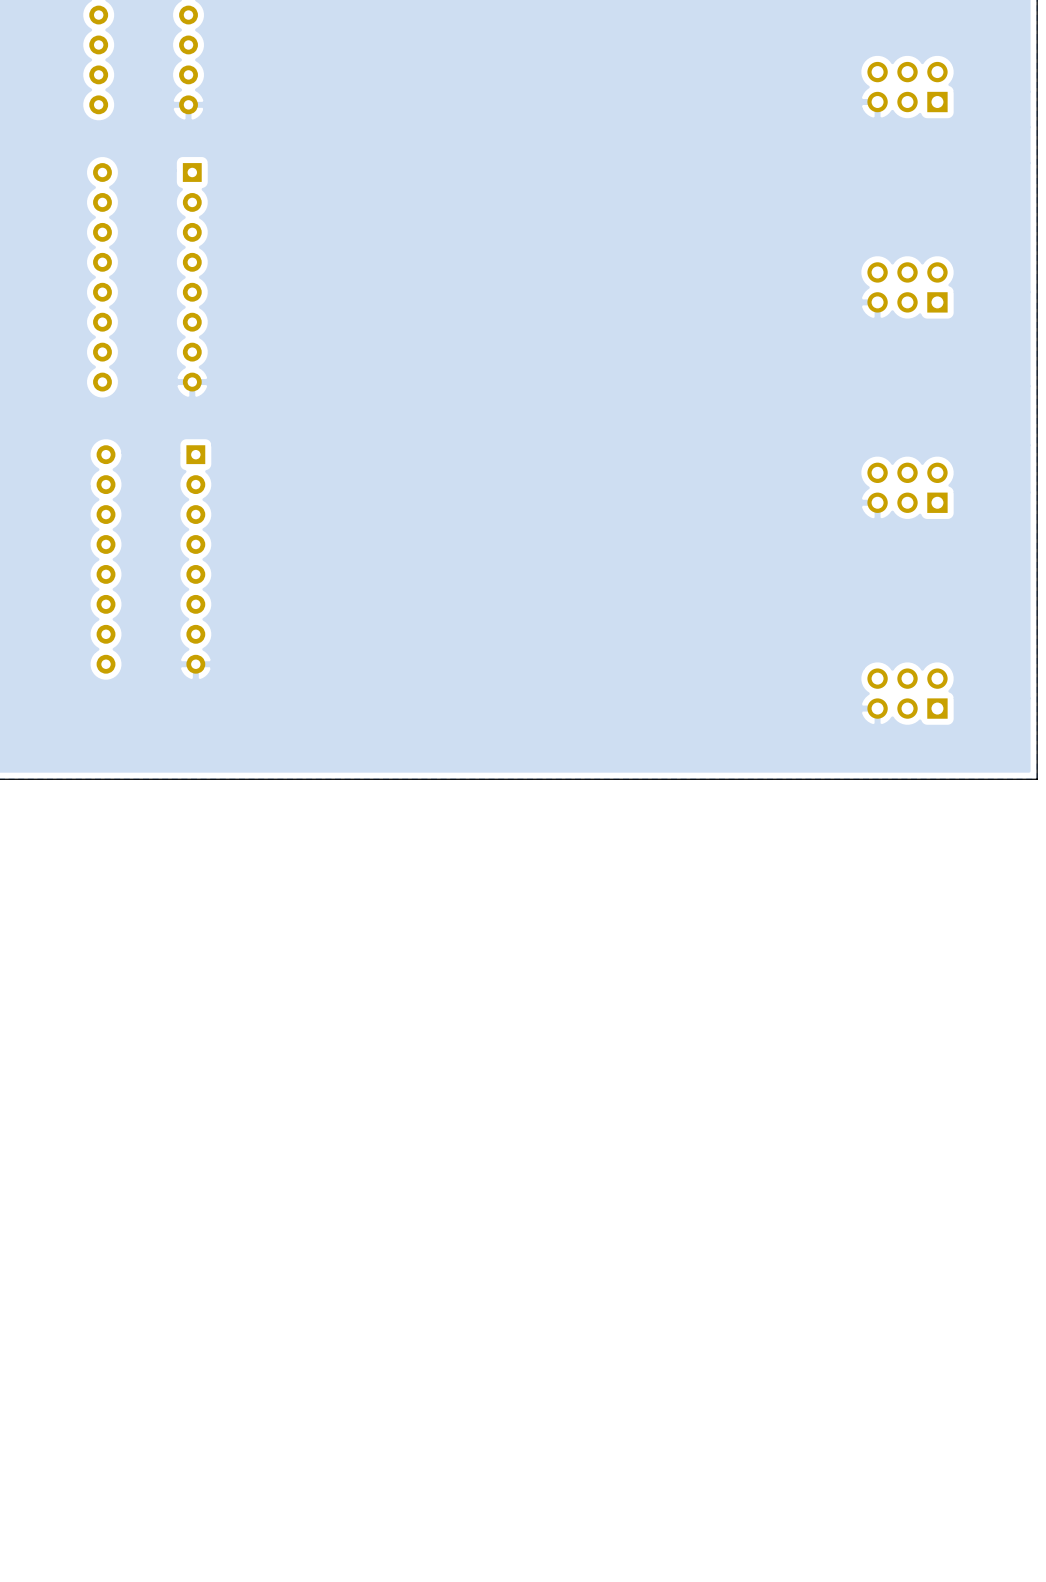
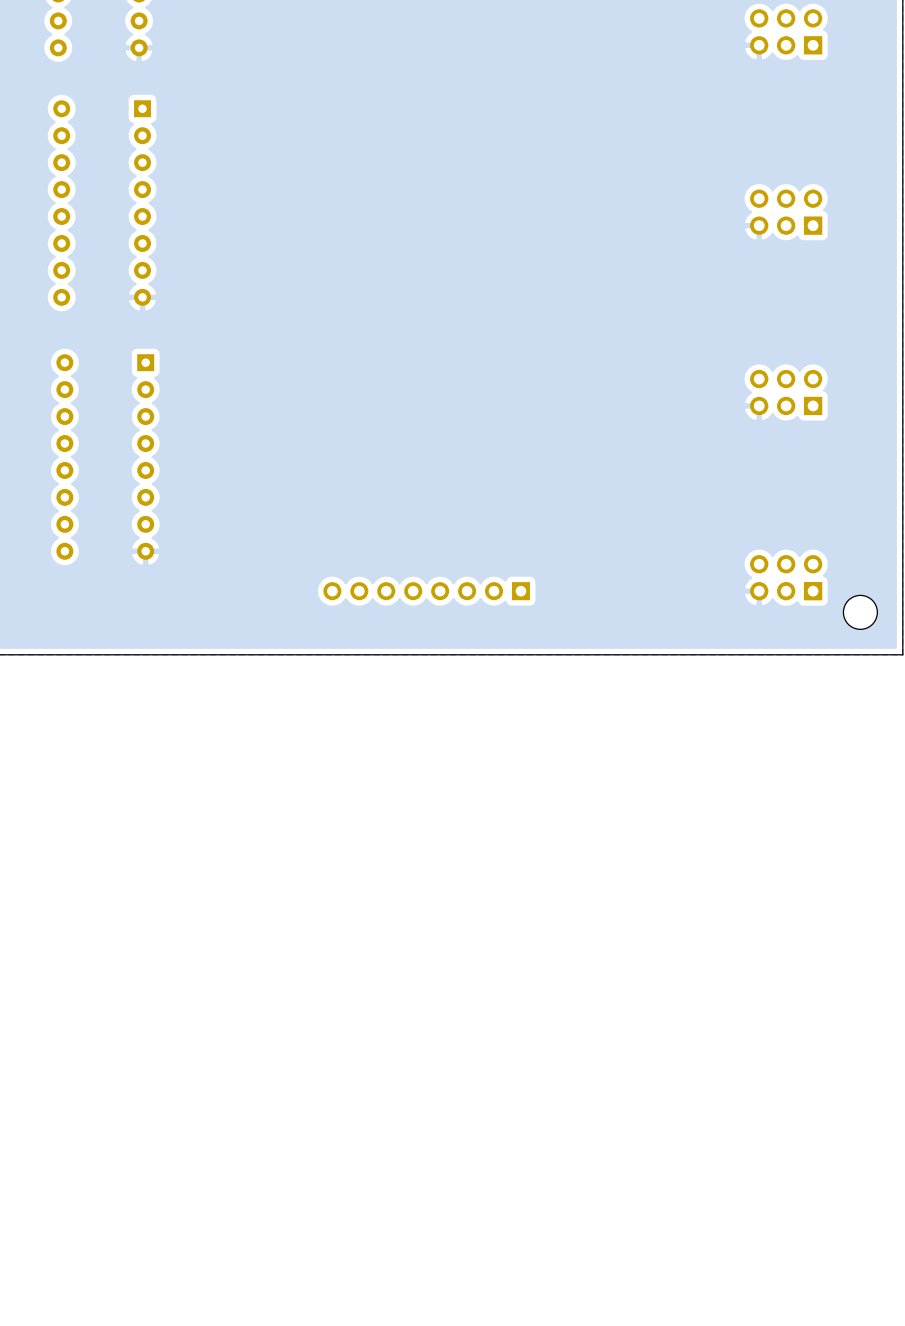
part: none -> (426, 591)
part: none -> (860, 612)

